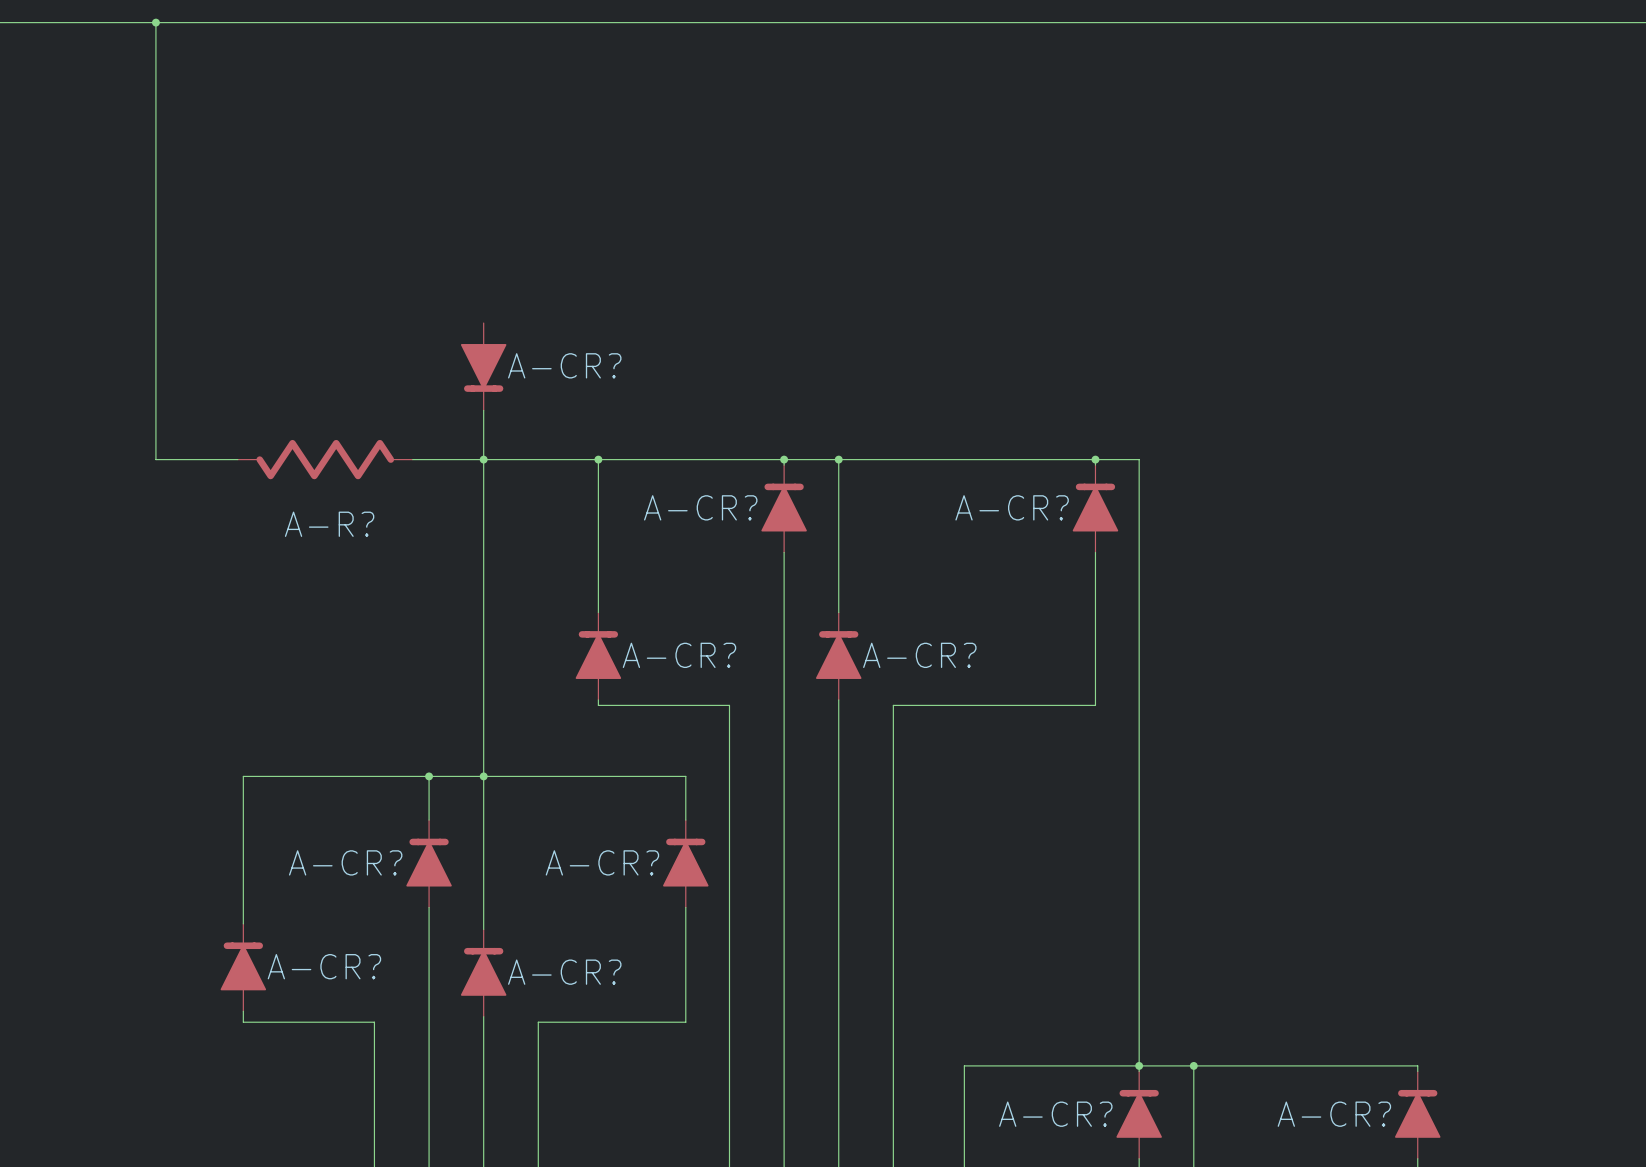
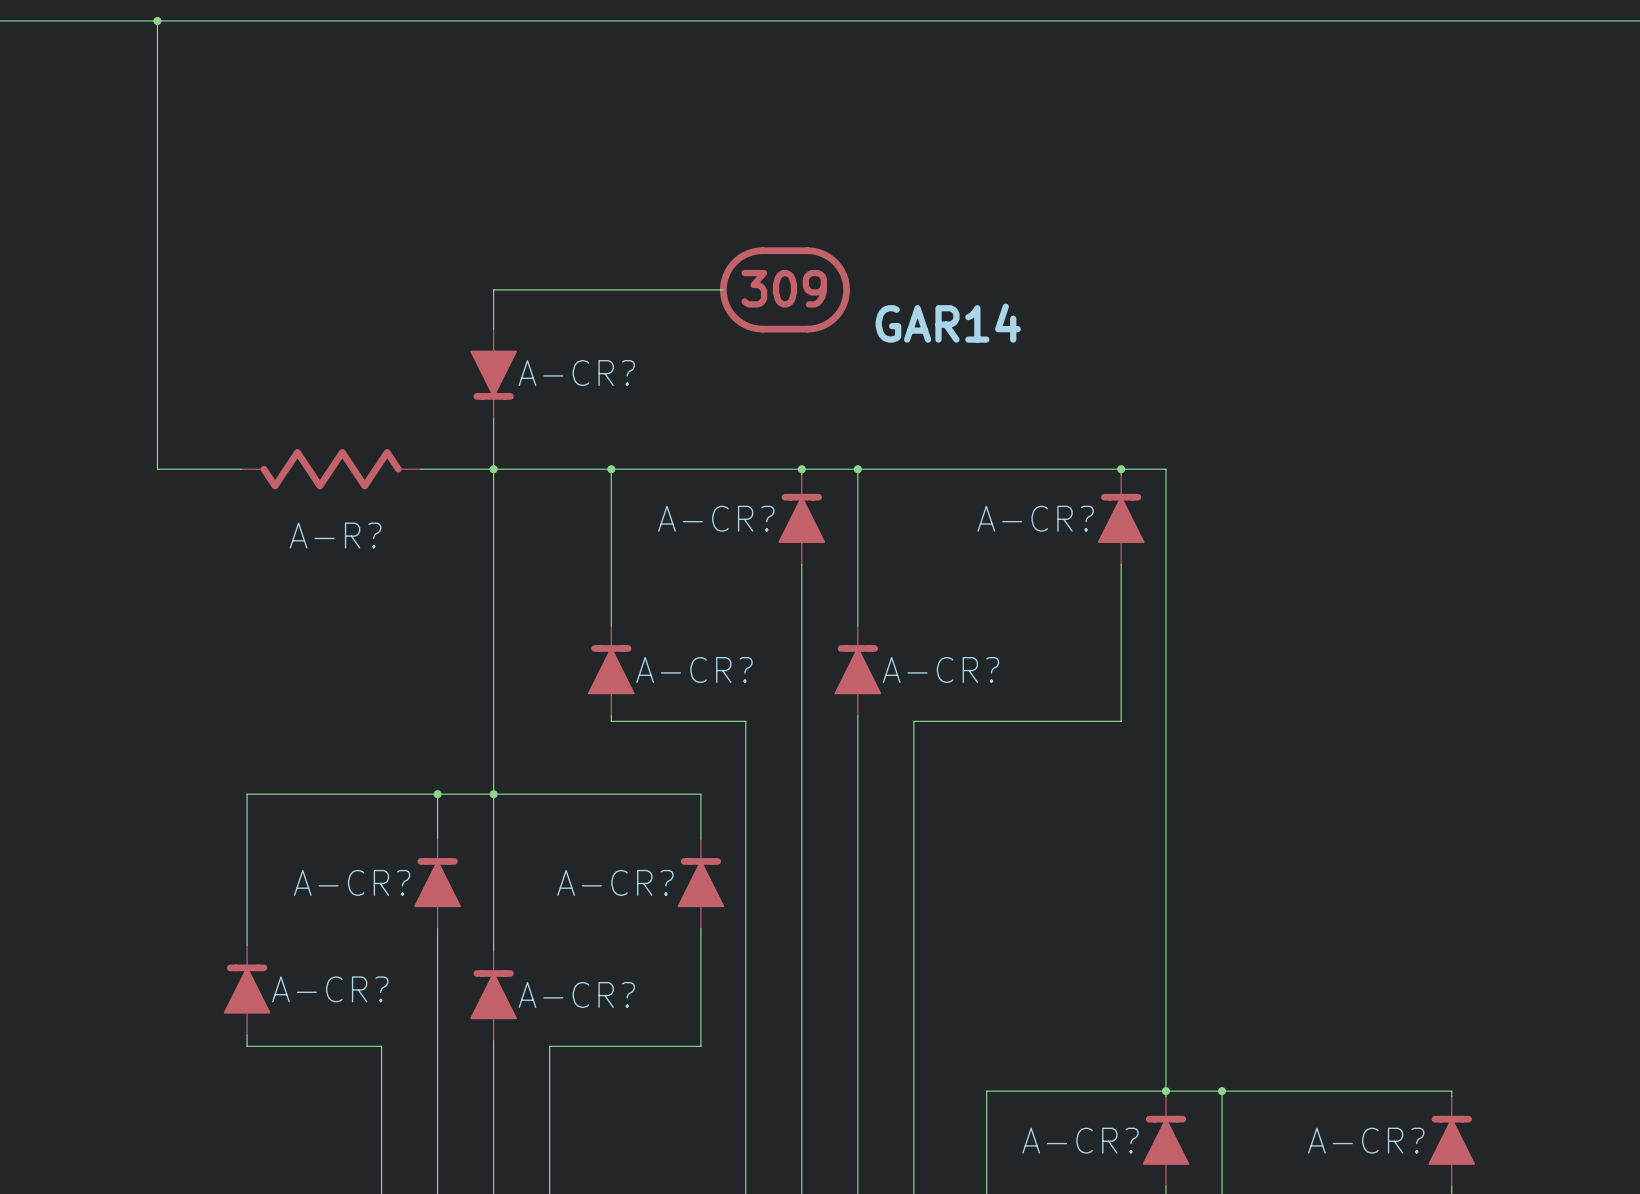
wire: none -> (723, 289) (493, 289) (493, 329)
part: none -> (784, 289)

